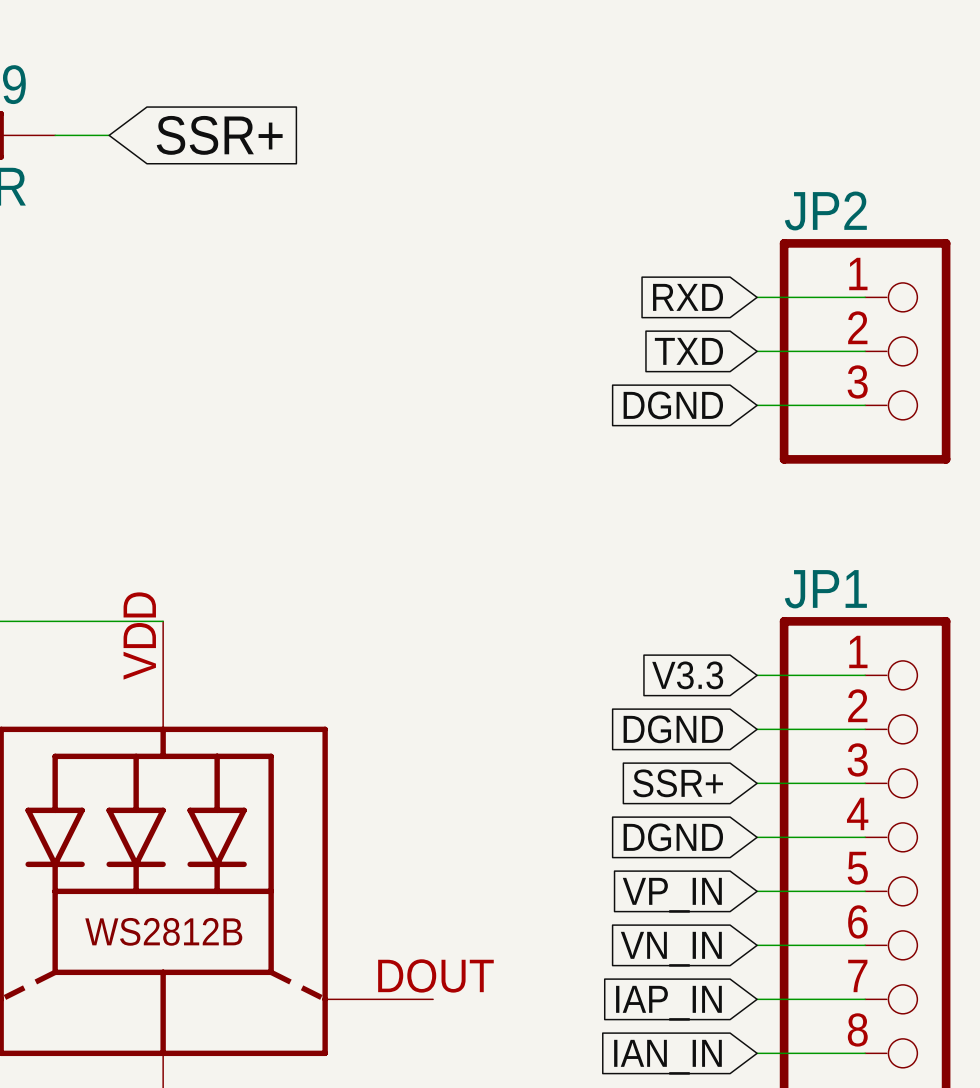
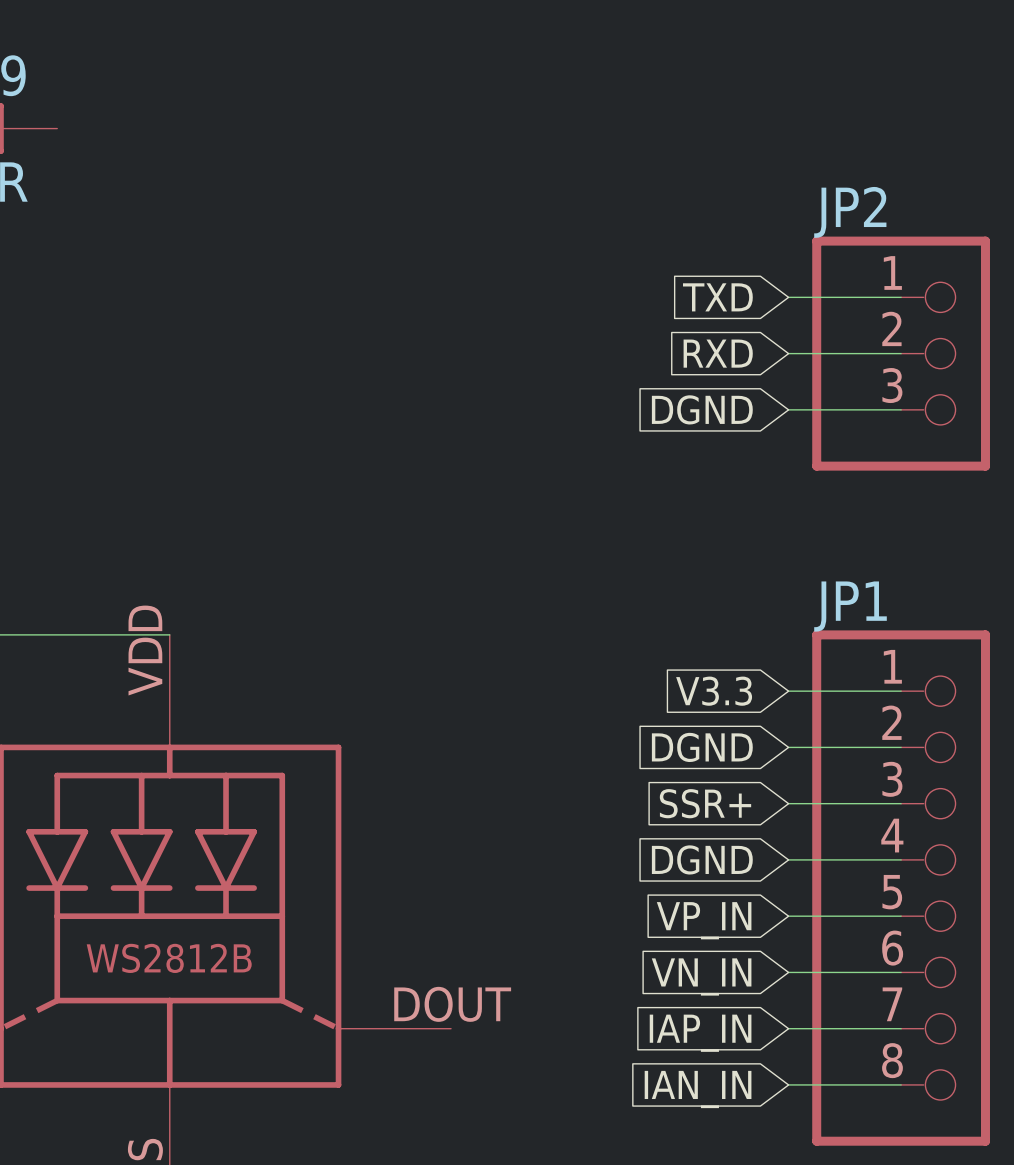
wire: (55, 135) (109, 135) -> none
global label: SSR+ (219, 135) -> none
global label: RXD (688, 297) -> TXD (717, 297)
global label: TXD (688, 351) -> RXD (718, 353)

